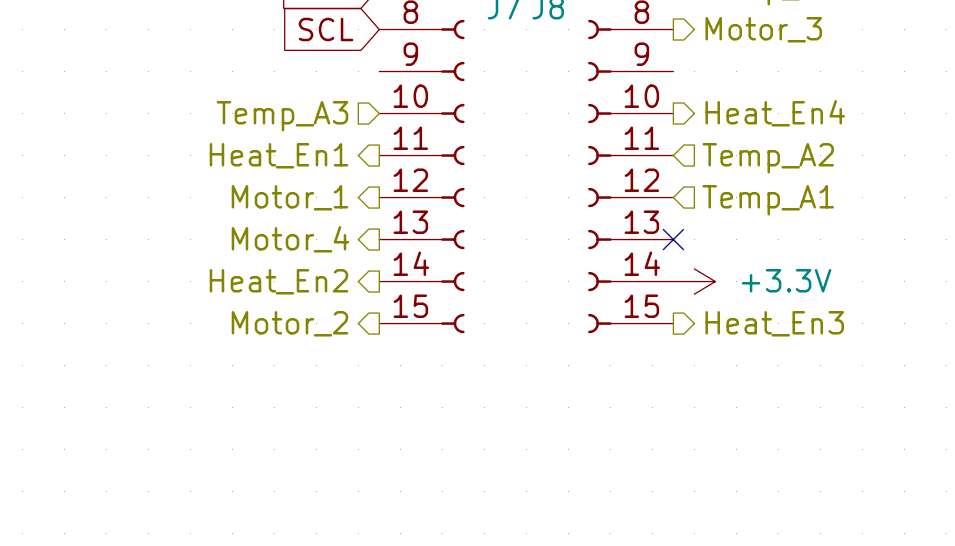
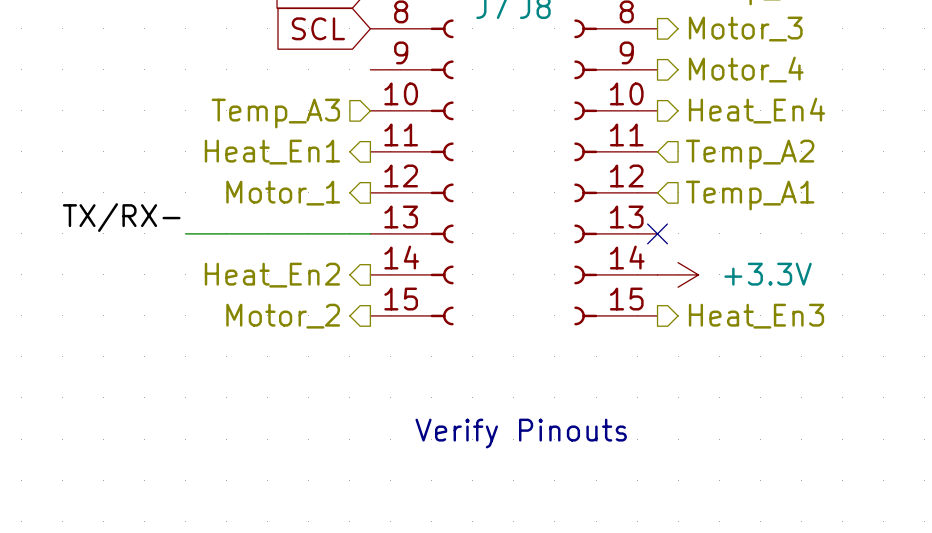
label: none -> TX/RX- (121, 217)
wire: none -> (185, 233) (370, 233)
hierarchical label rotation: 0° (290, 239) -> 180° (746, 69)
hierarchical label position: Motor_4 (290, 239) -> Motor_4 (746, 69)
text: none -> Verify Pinouts (521, 433)

